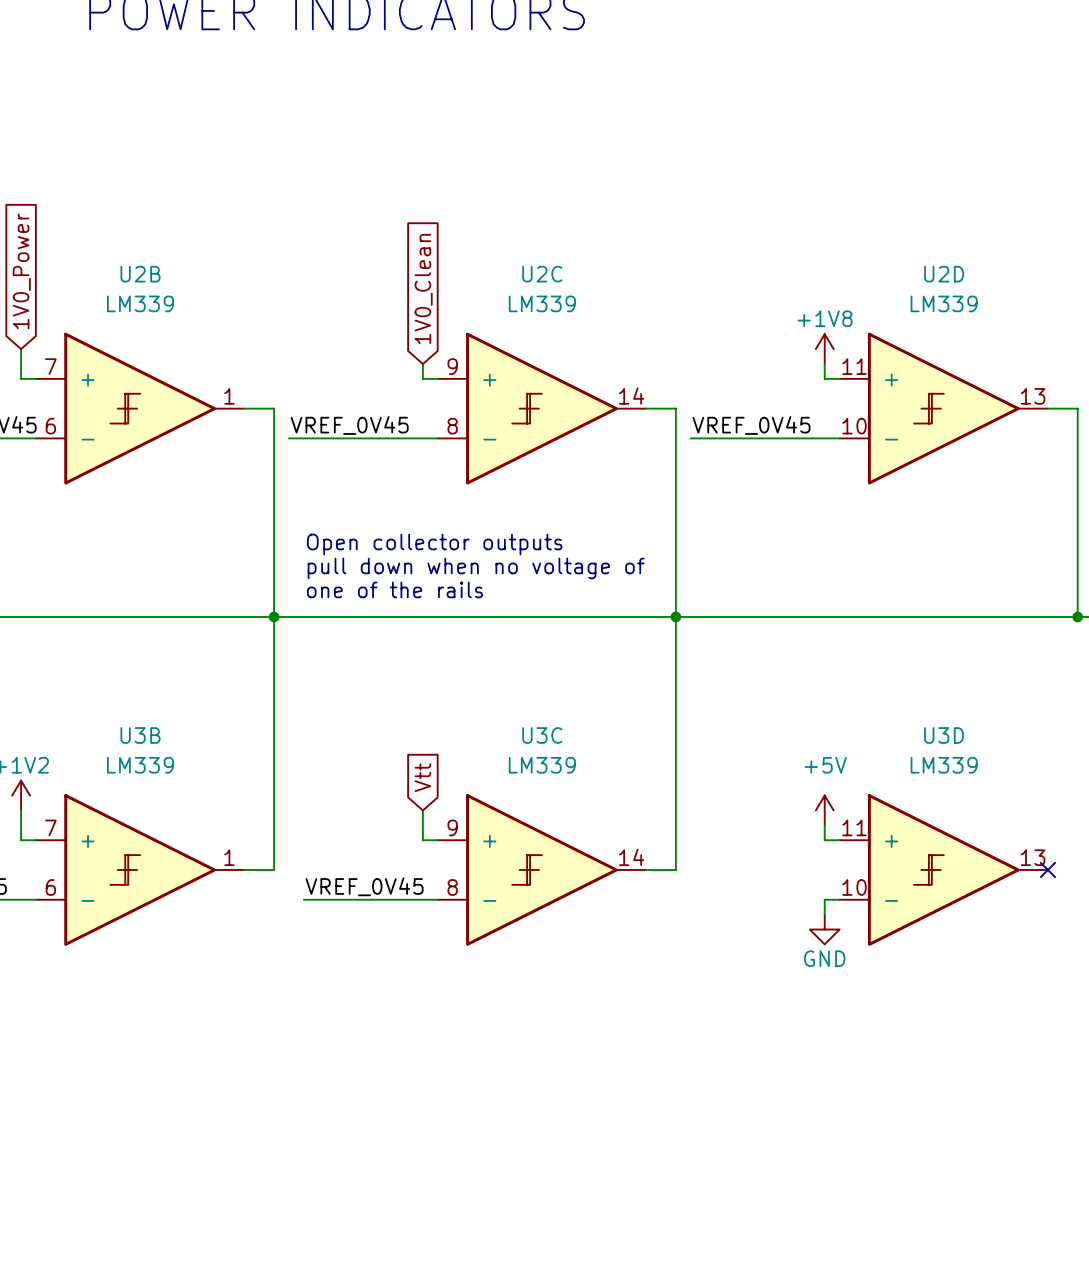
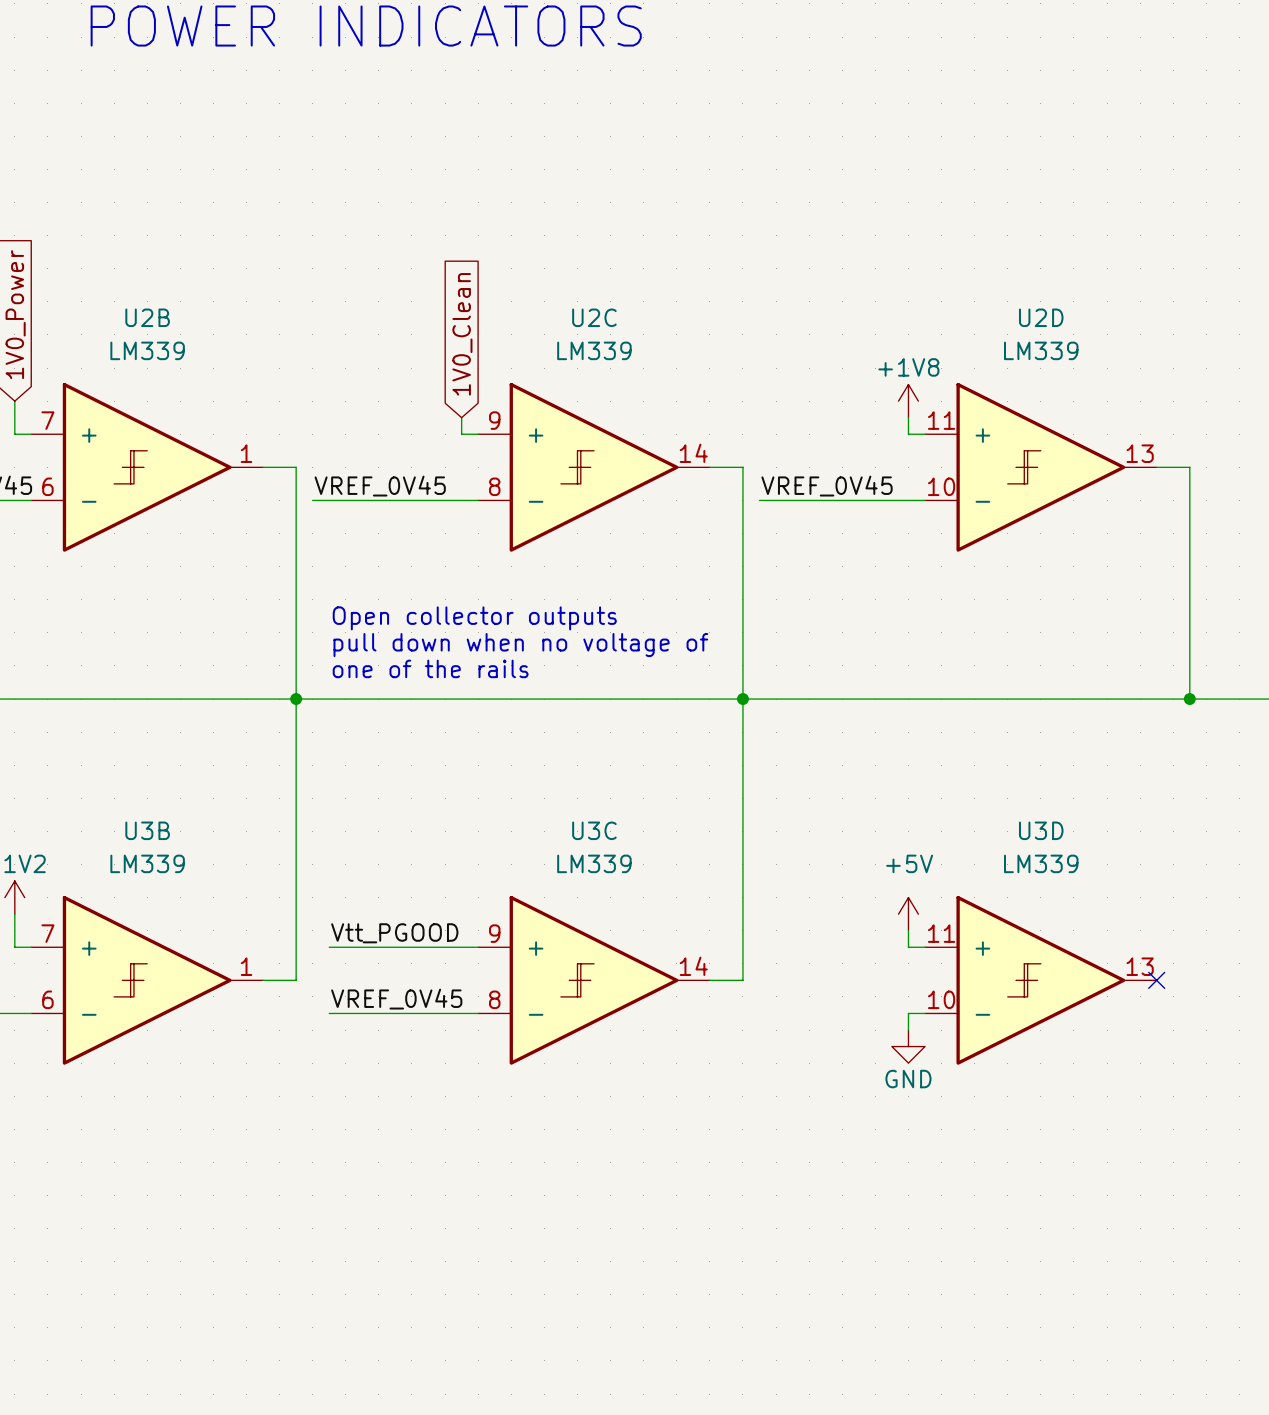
global label: Vtt (422, 777) -> none
wire: (422, 810) (422, 840) -> (329, 947) (461, 947)
label: none -> Vtt_PGOOD (394, 933)

